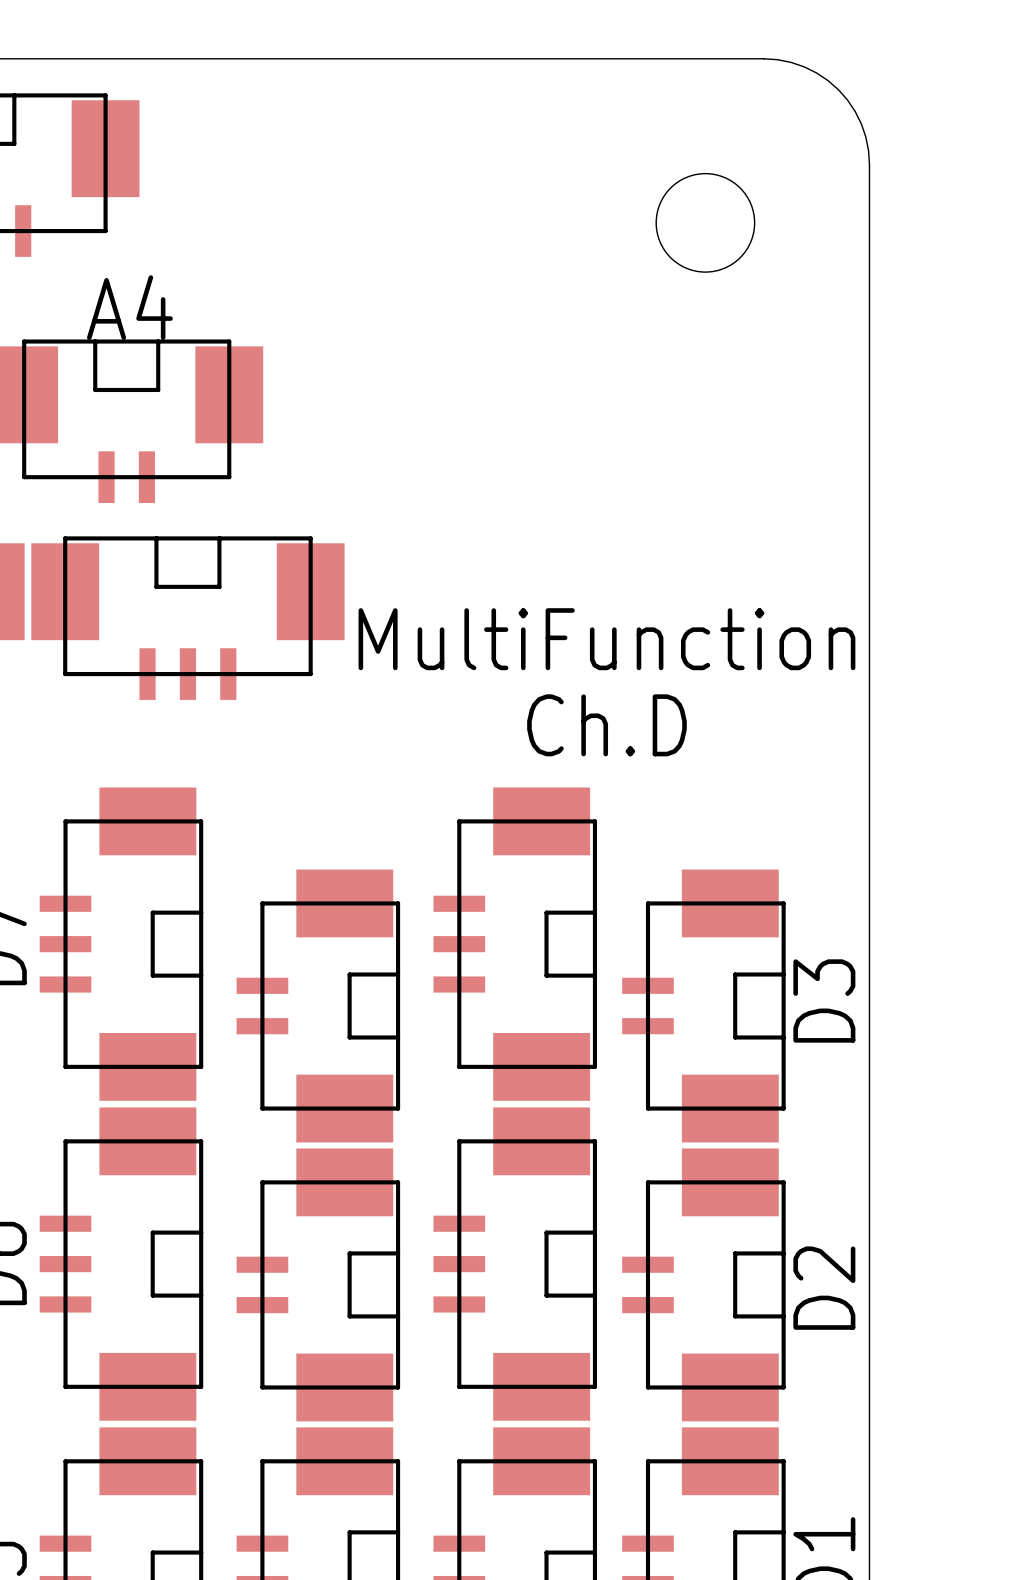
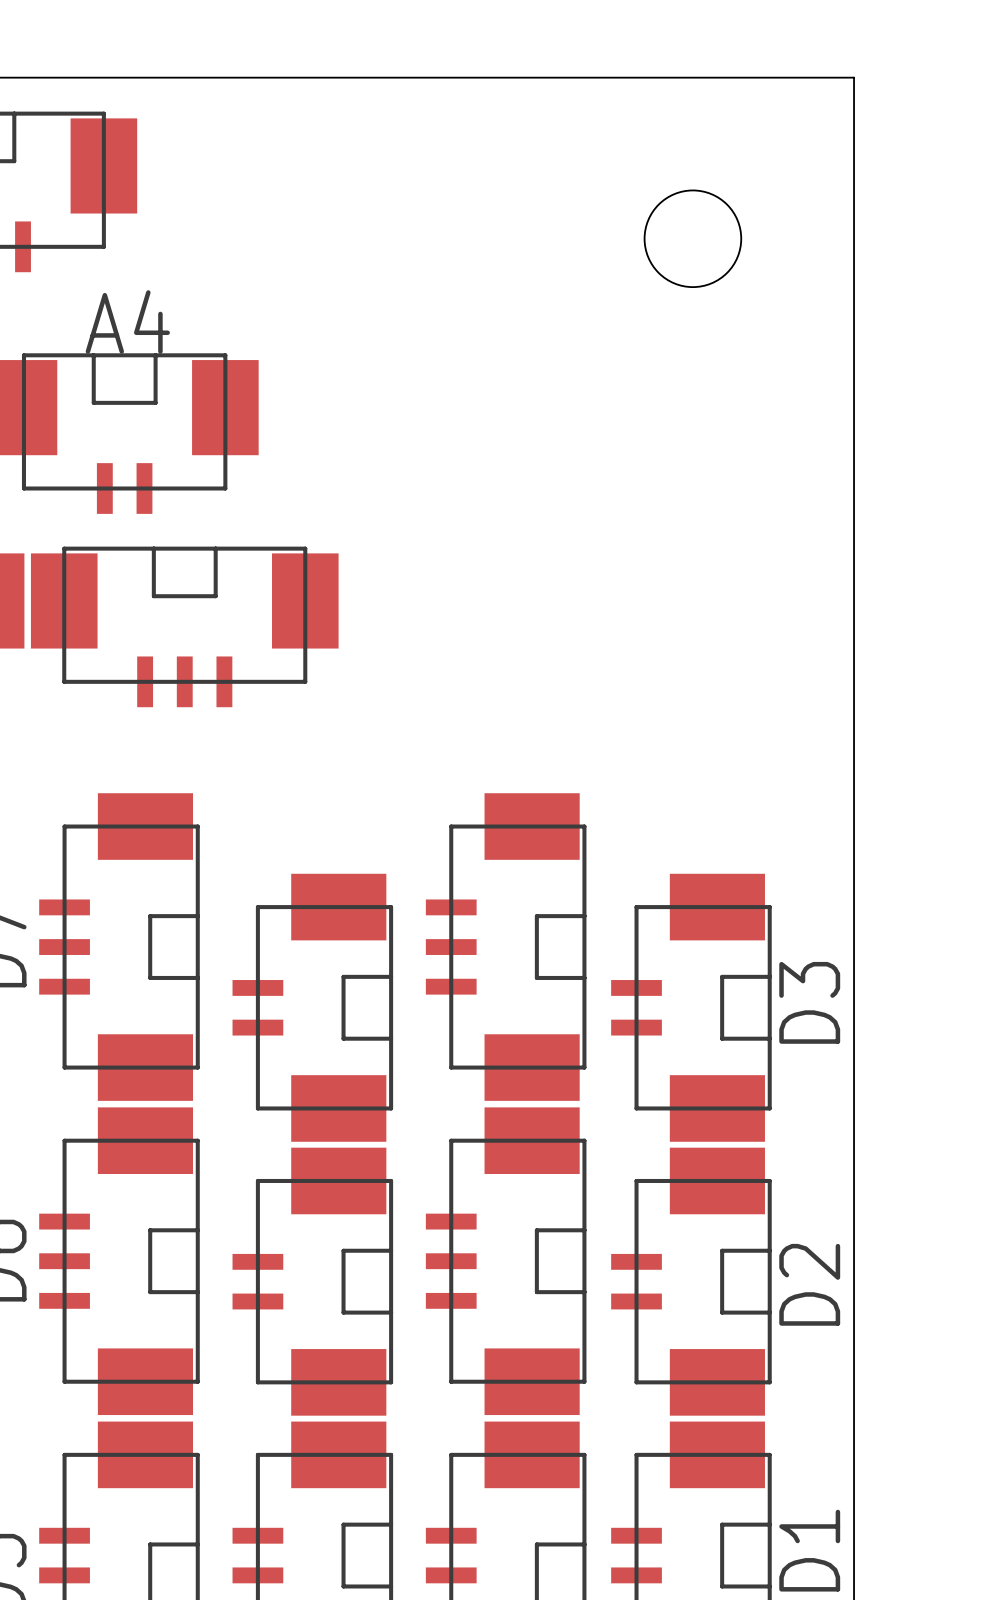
board edge: (763, 58) (791, 62) (804, 66) (828, 80) (838, 89) (847, 100) (861, 124) (865, 137) (869, 164) -> (750, 77) (854, 77) (854, 181)
text: MultiFunction (606, 639) -> none
text: Ch.D (606, 725) -> none

